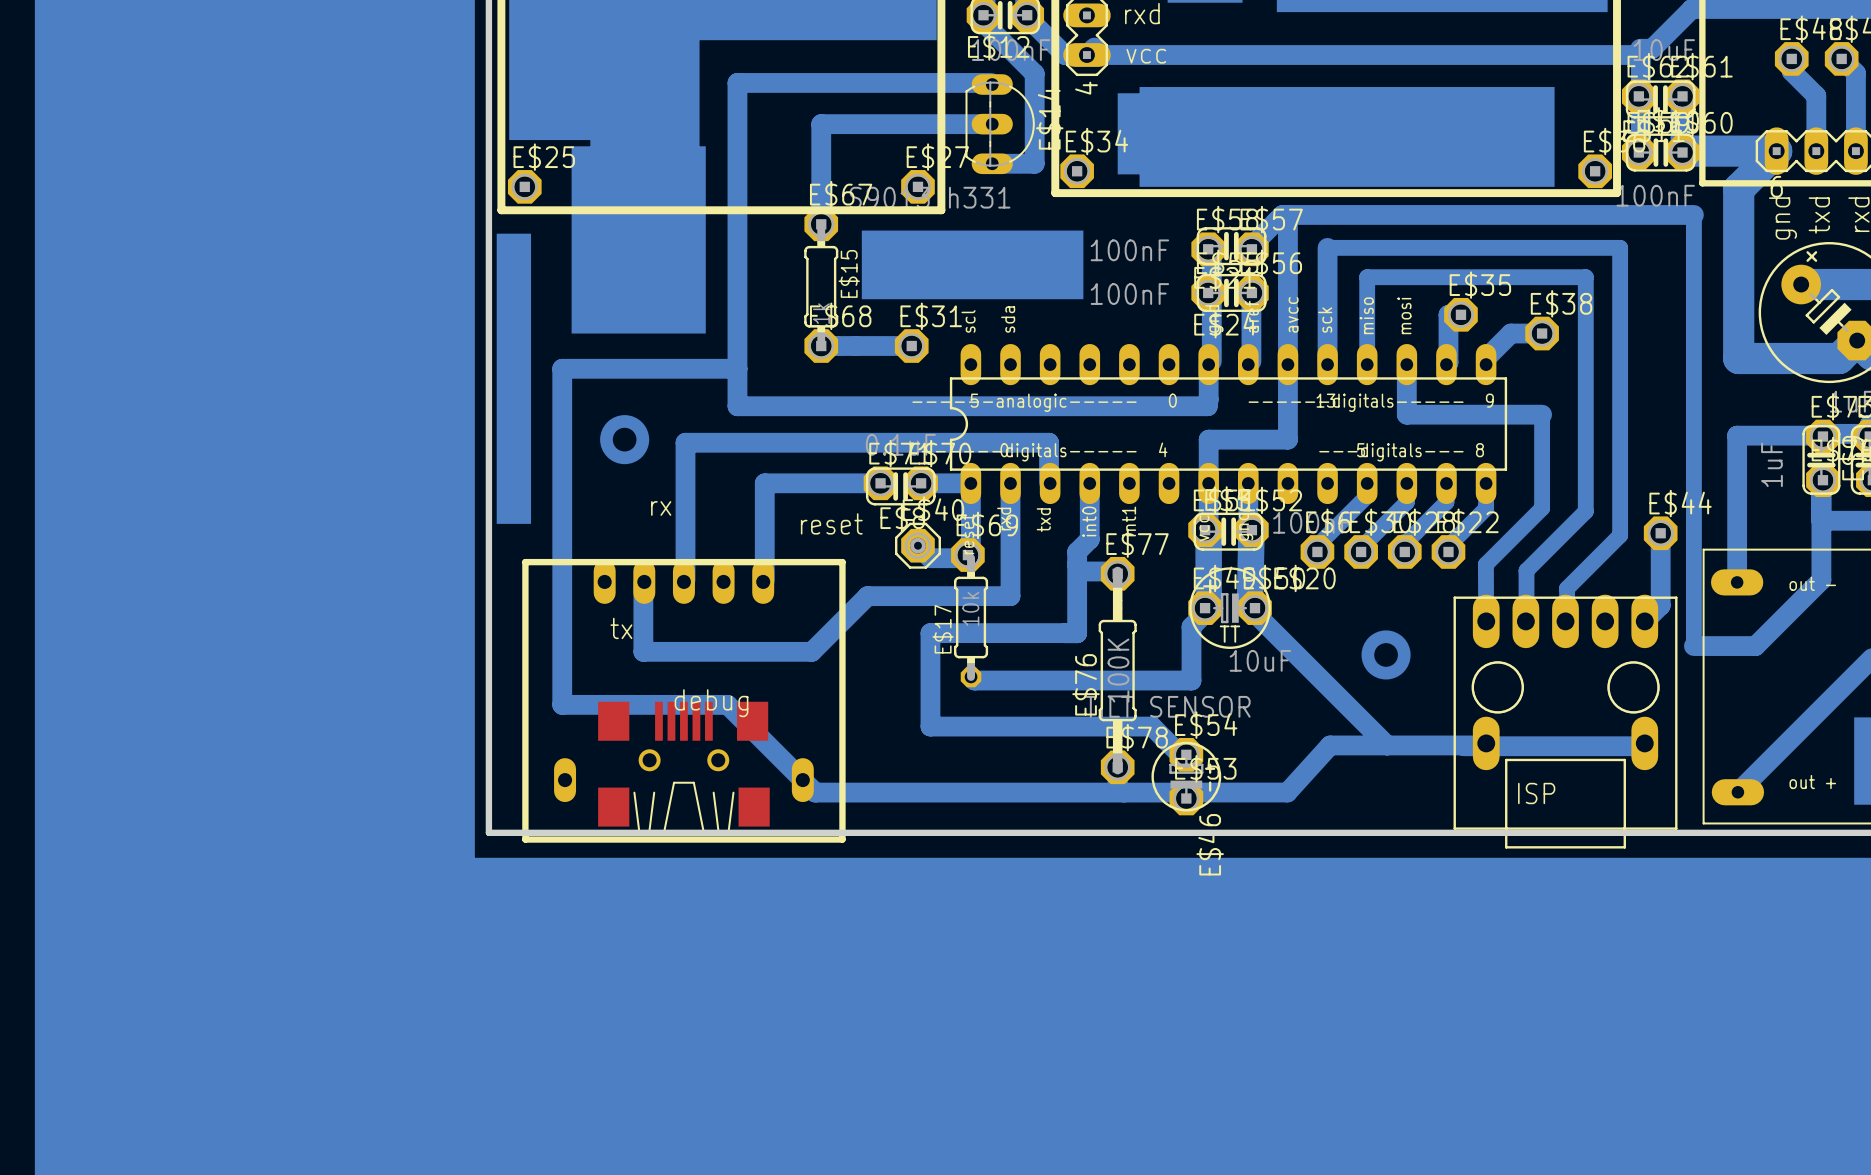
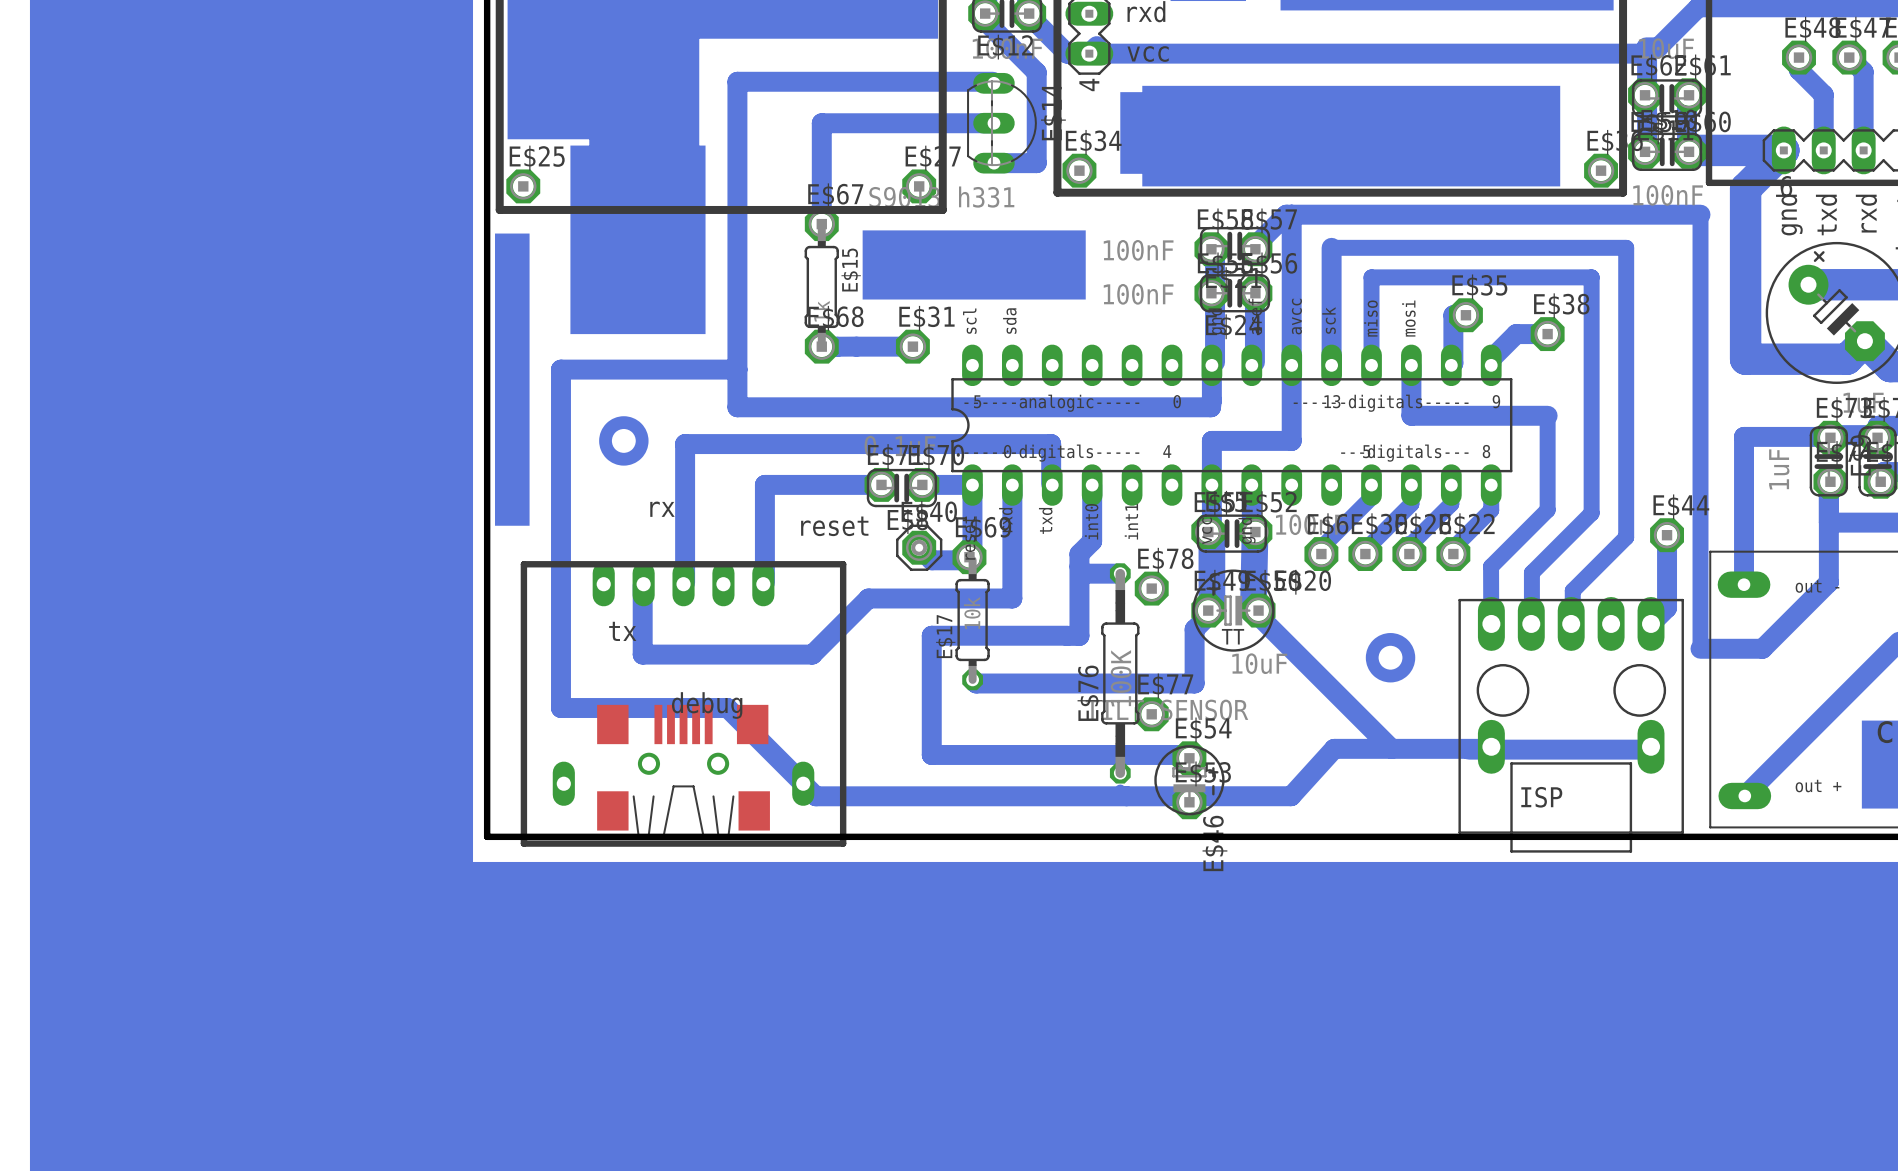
E$77 position: (1117, 573) -> (1151, 714)
bottom track: (930, 726) (1152, 726) (1177, 751) -> (931, 729) (931, 754) (1180, 754)
E$78 position: (1117, 767) -> (1151, 588)

